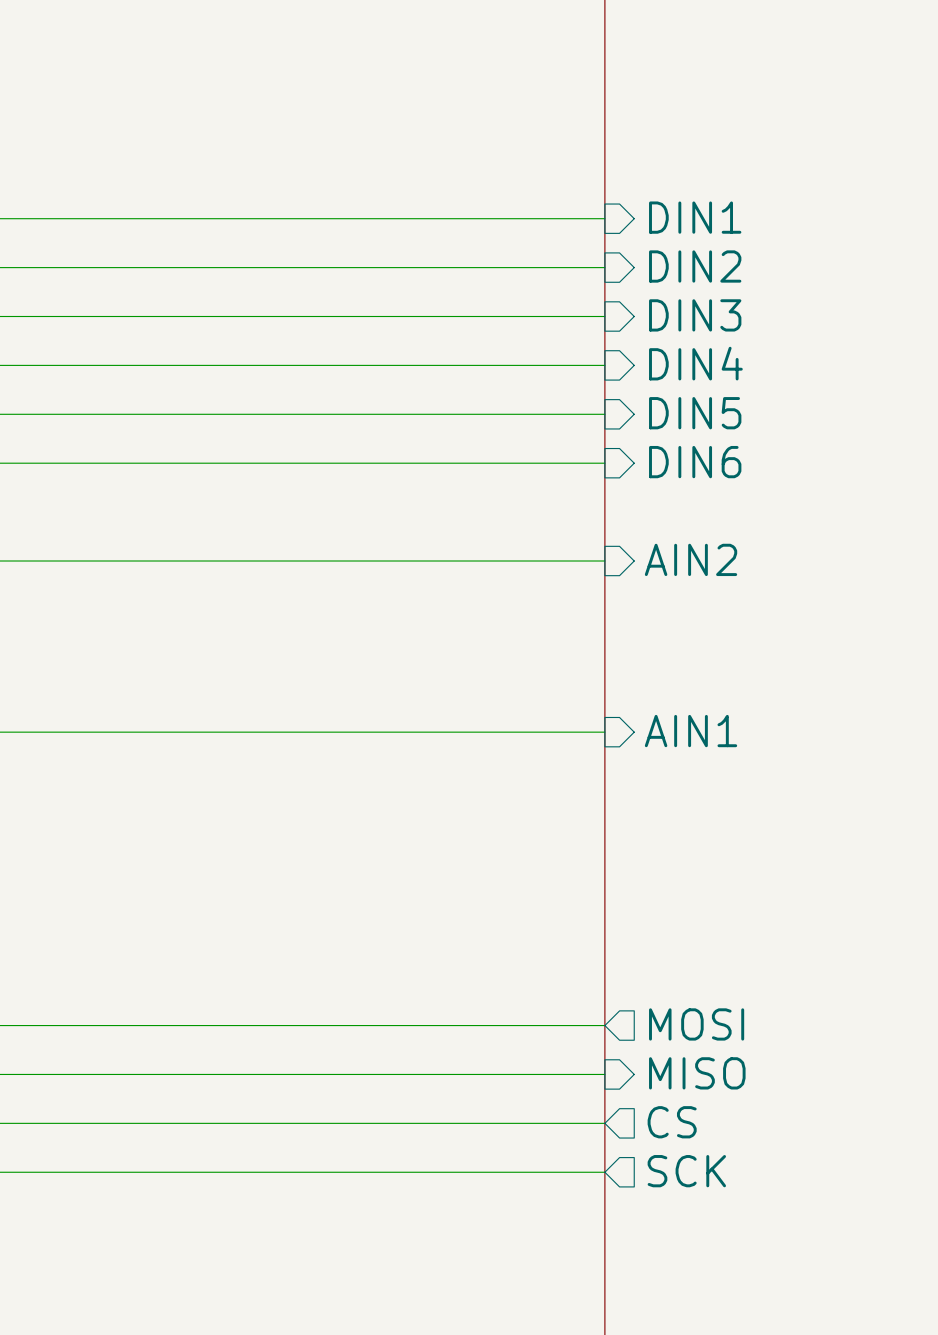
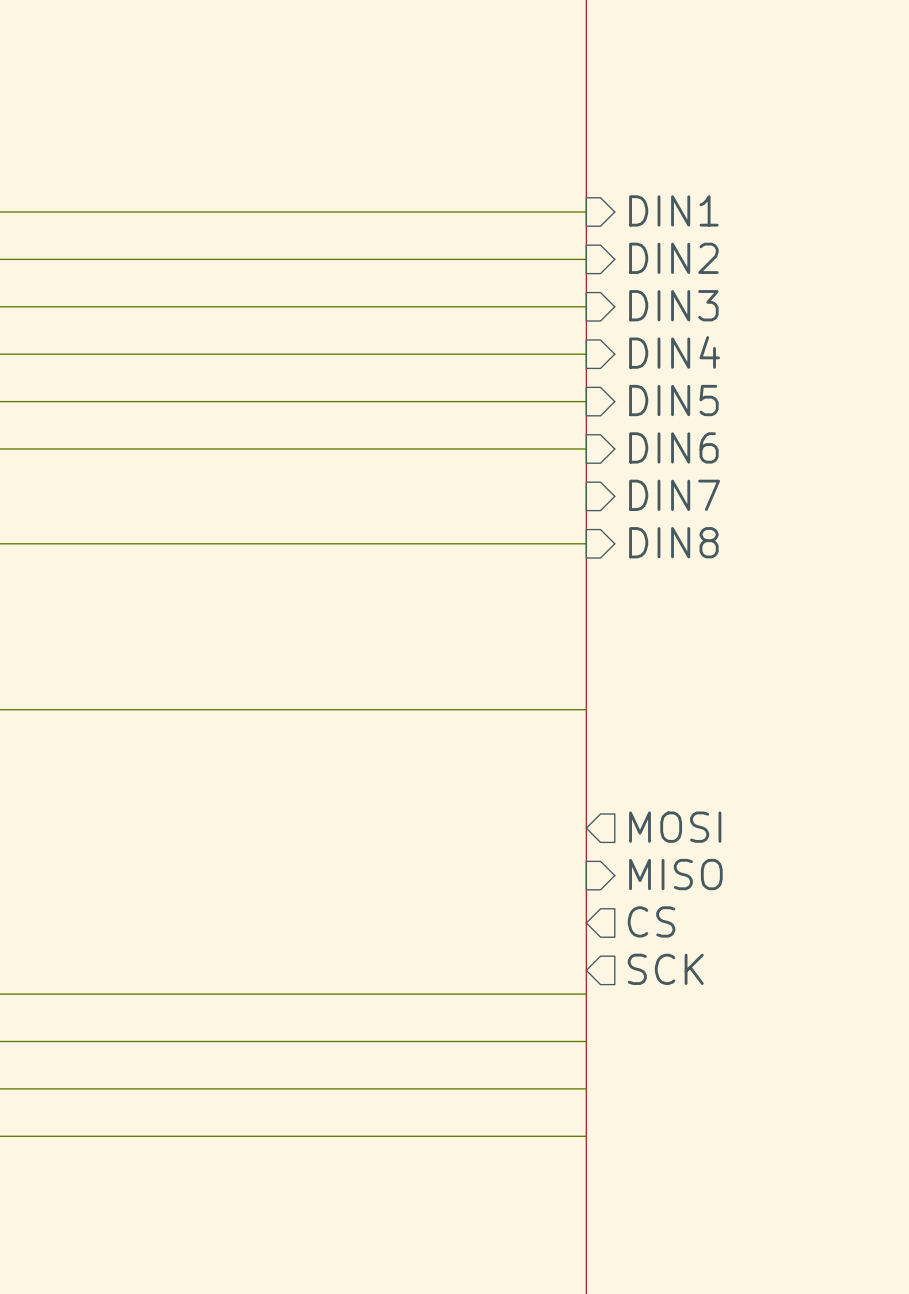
sheet pin: none -> DIN7 (674, 495)
sheet pin: AIN2 (691, 559) -> DIN8 (673, 542)
sheet pin: AIN1 (691, 731) -> none
sheet pin position: MOSI (696, 1024) -> MOSI (675, 827)
sheet pin position: MISO (697, 1073) -> MISO (675, 874)
sheet pin position: CS (672, 1122) -> CS (651, 921)
sheet pin position: SCK (686, 1171) -> SCK (665, 969)

